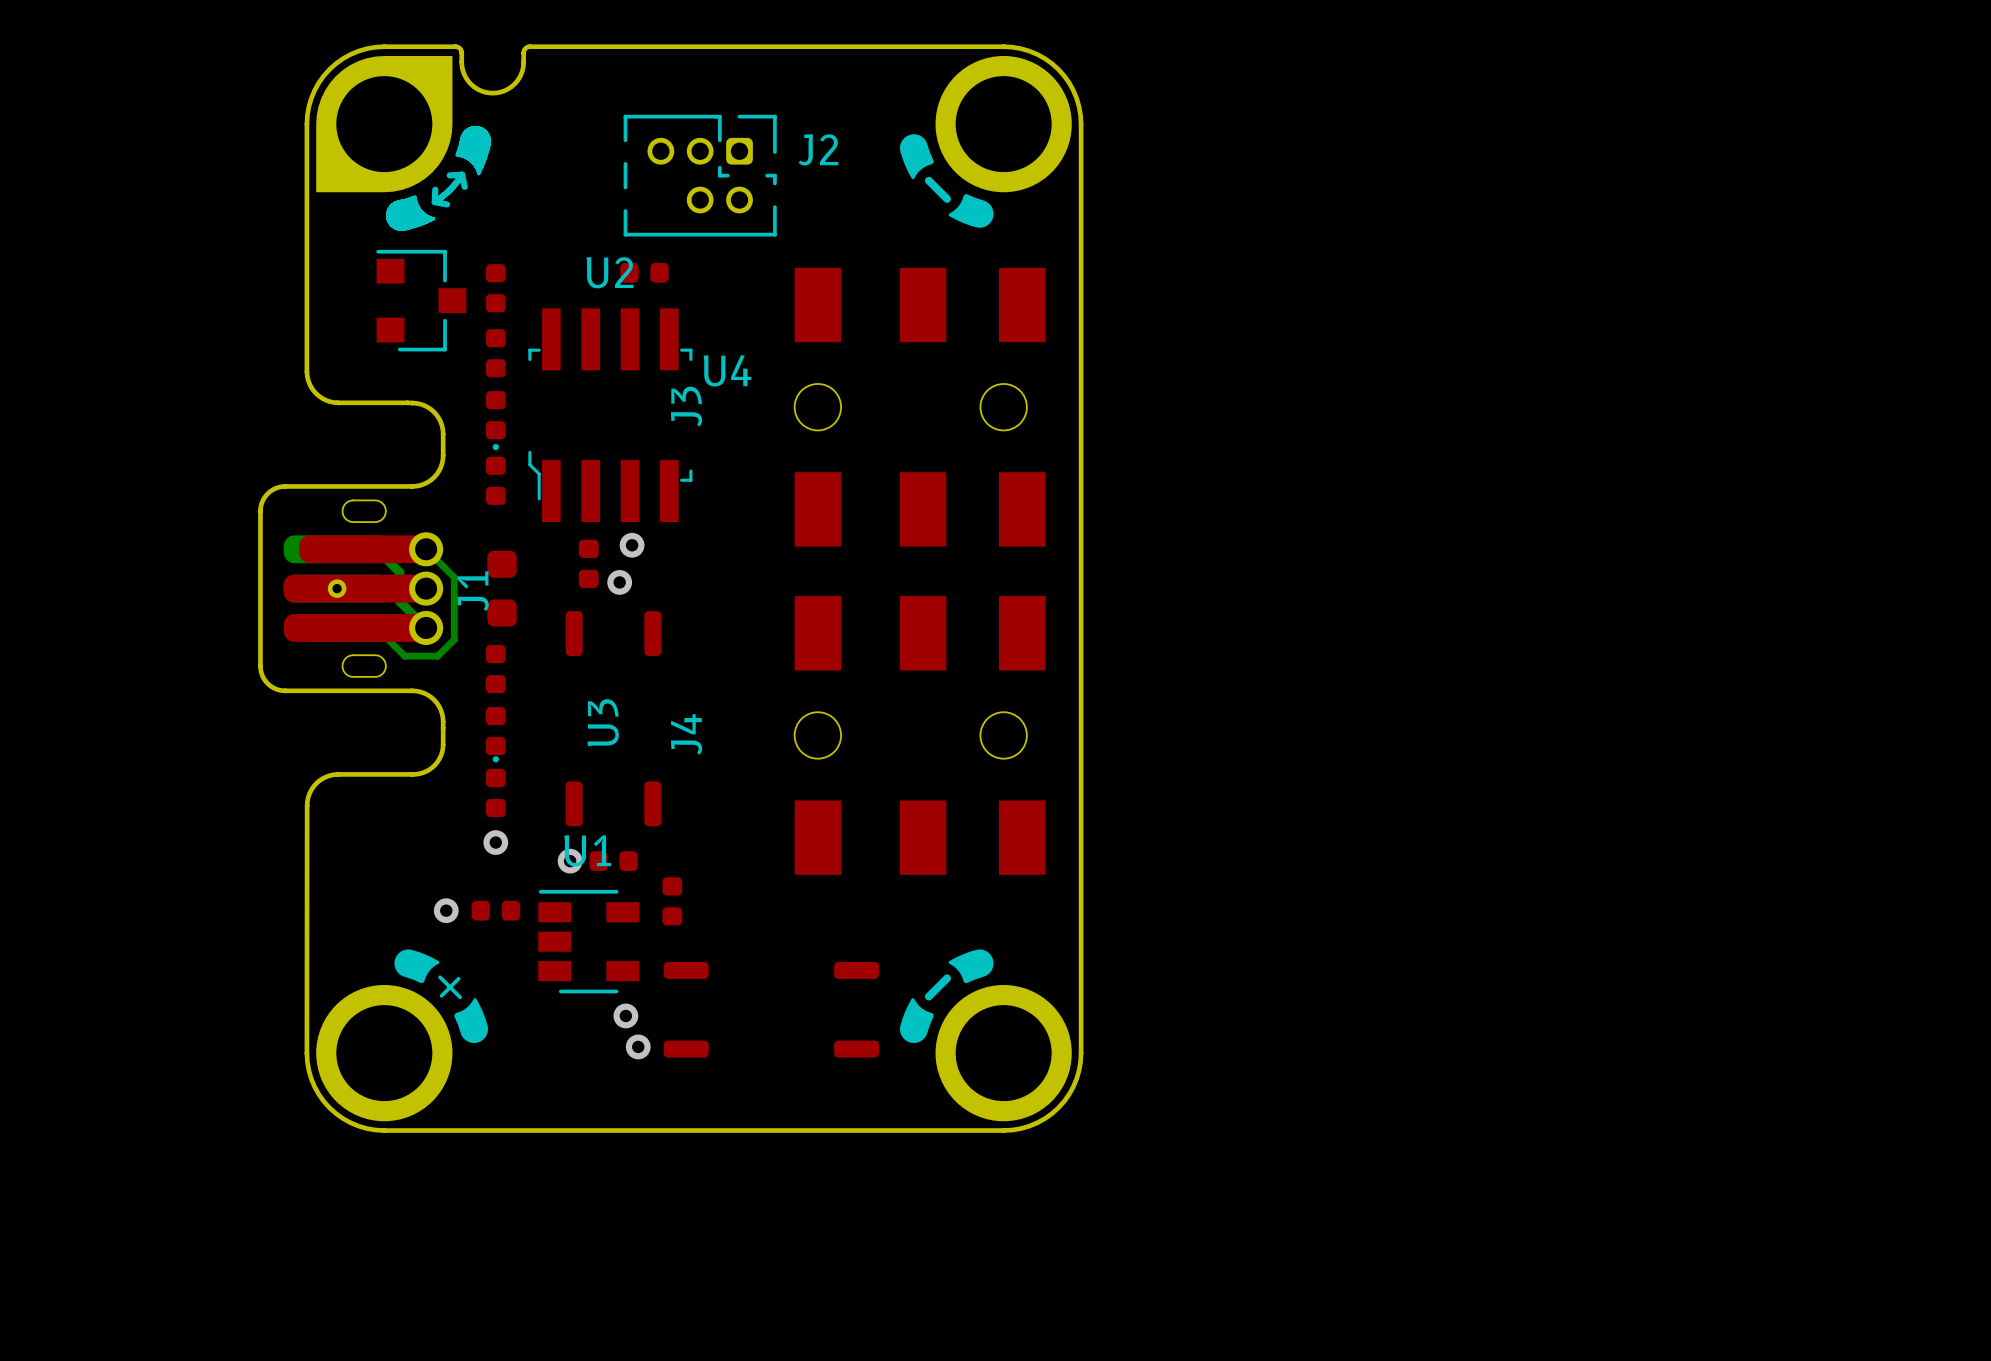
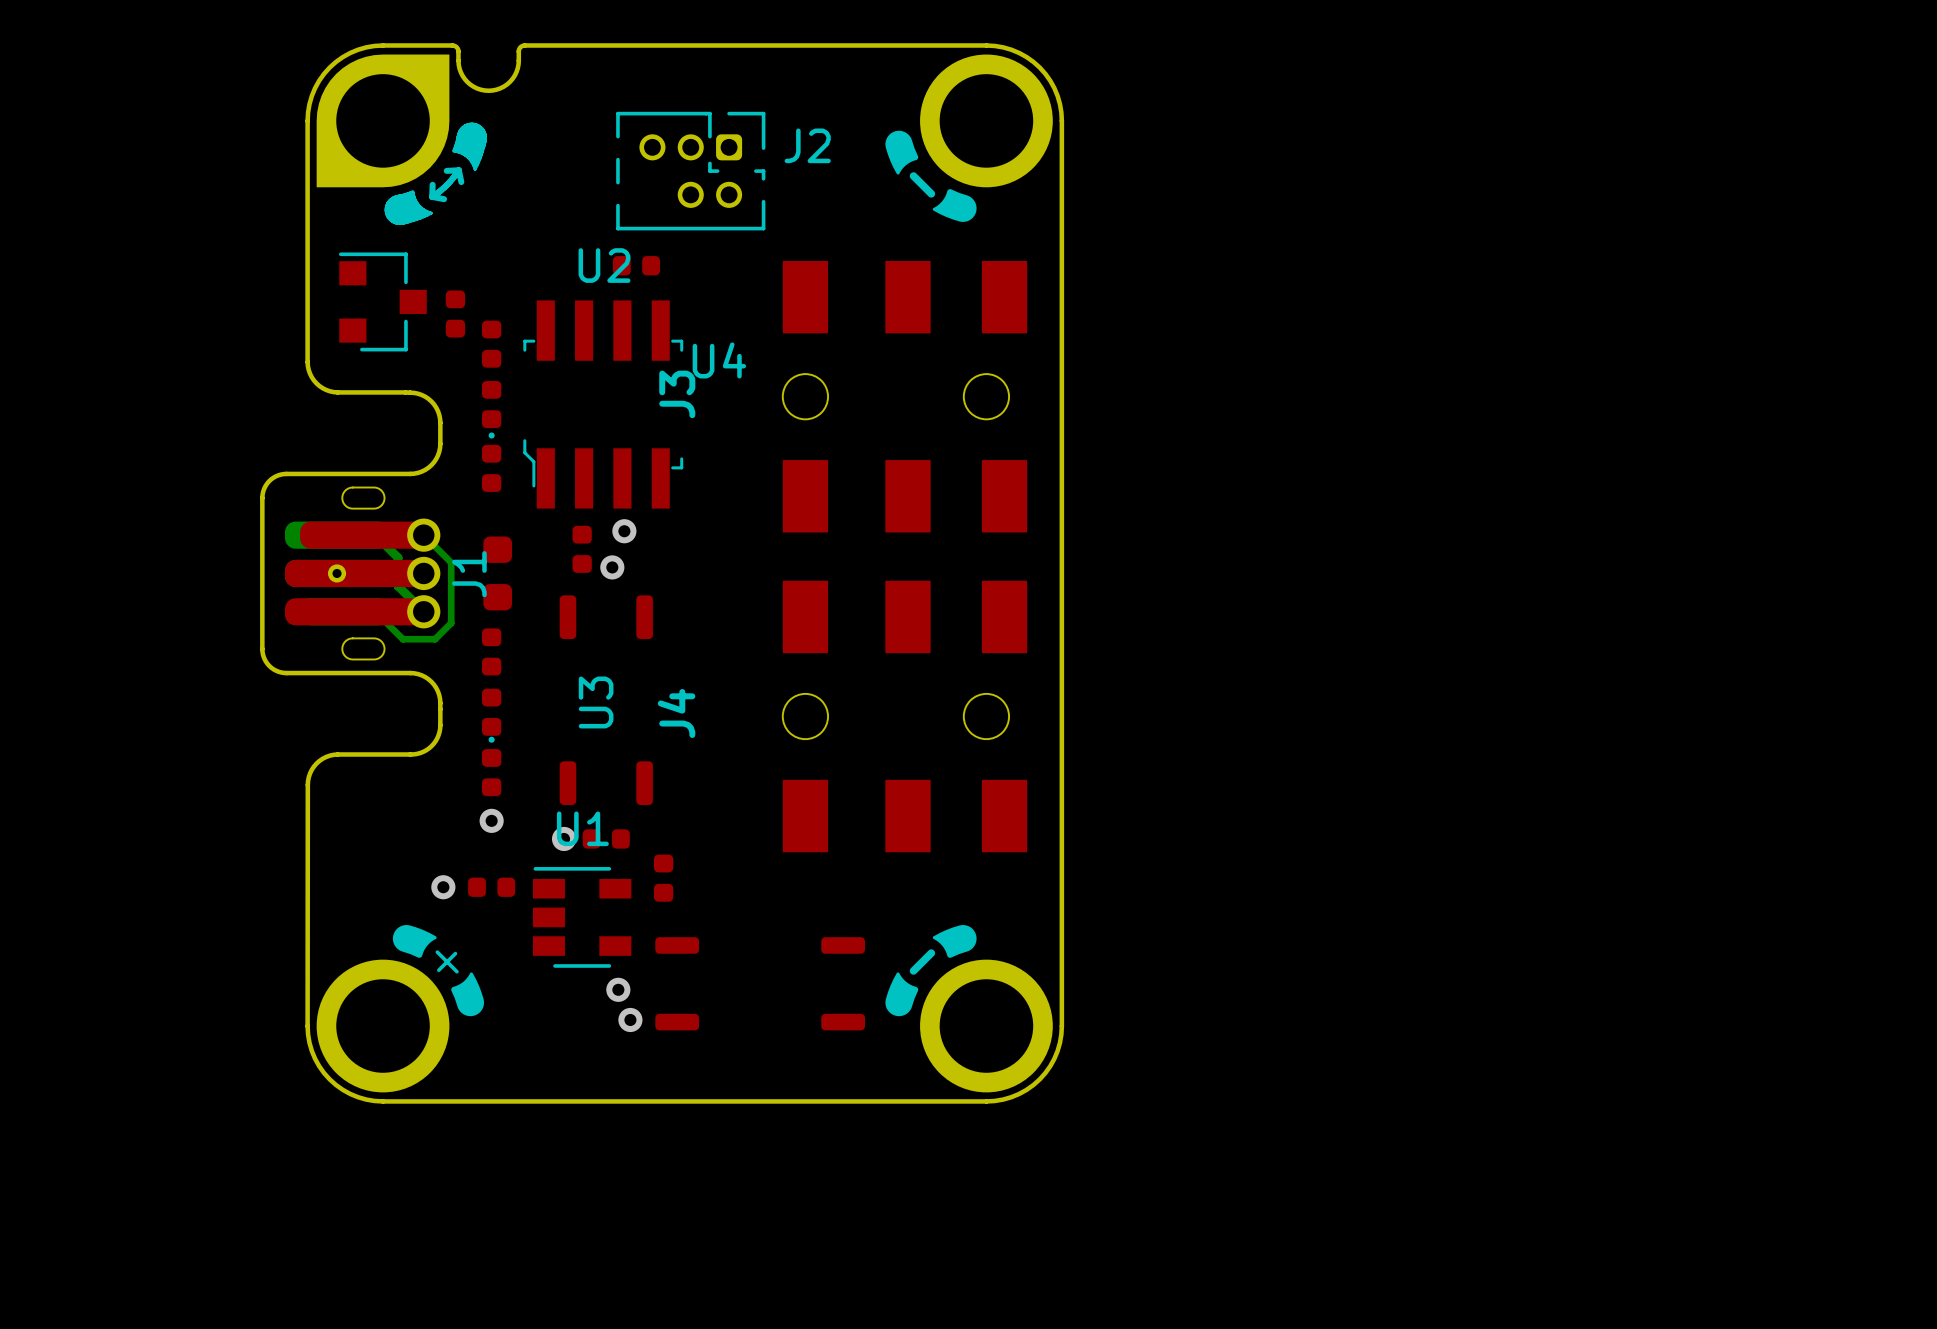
part position: (495, 288) -> (455, 314)
part position: (421, 300) -> (382, 301)

